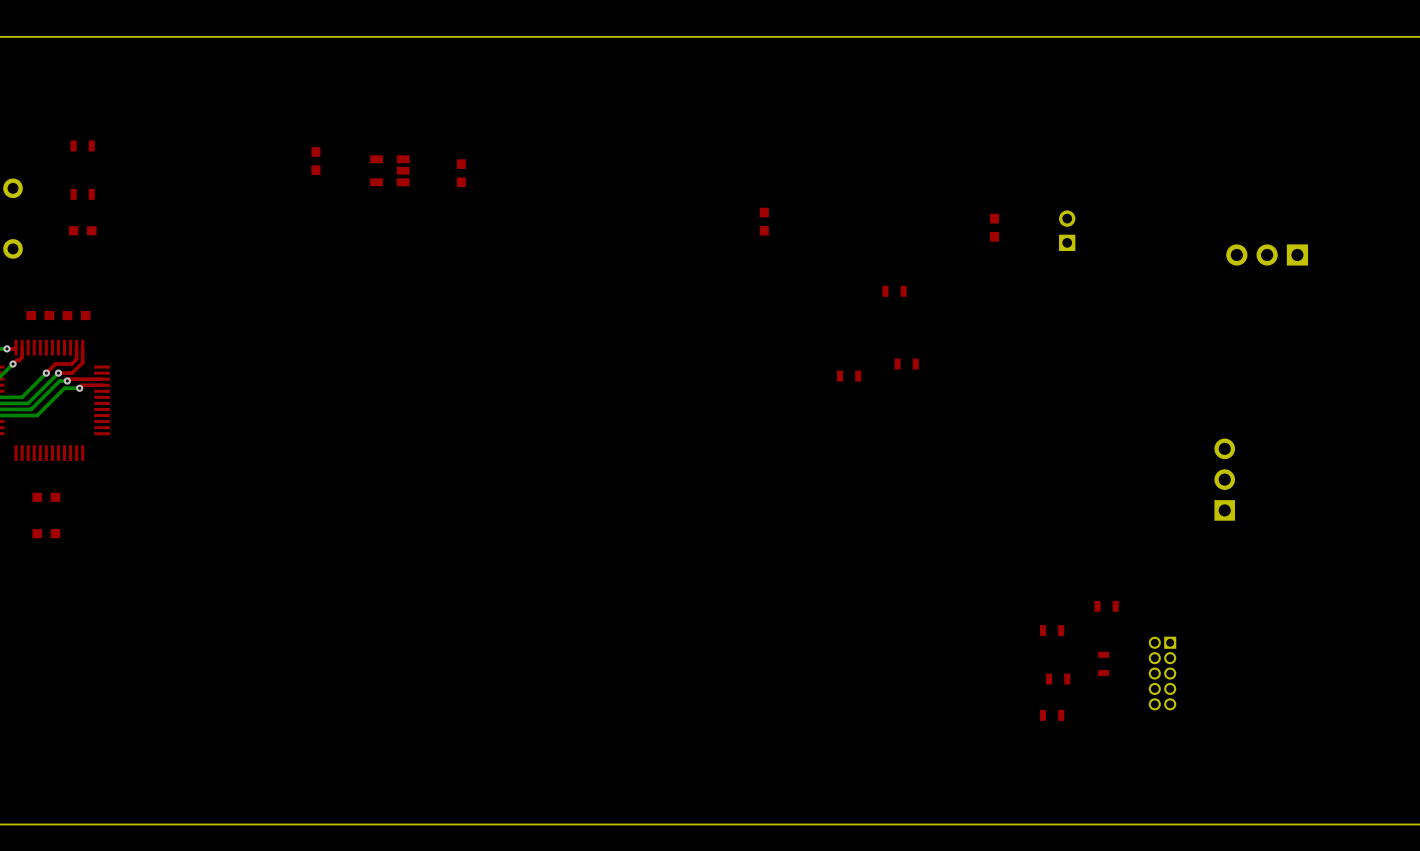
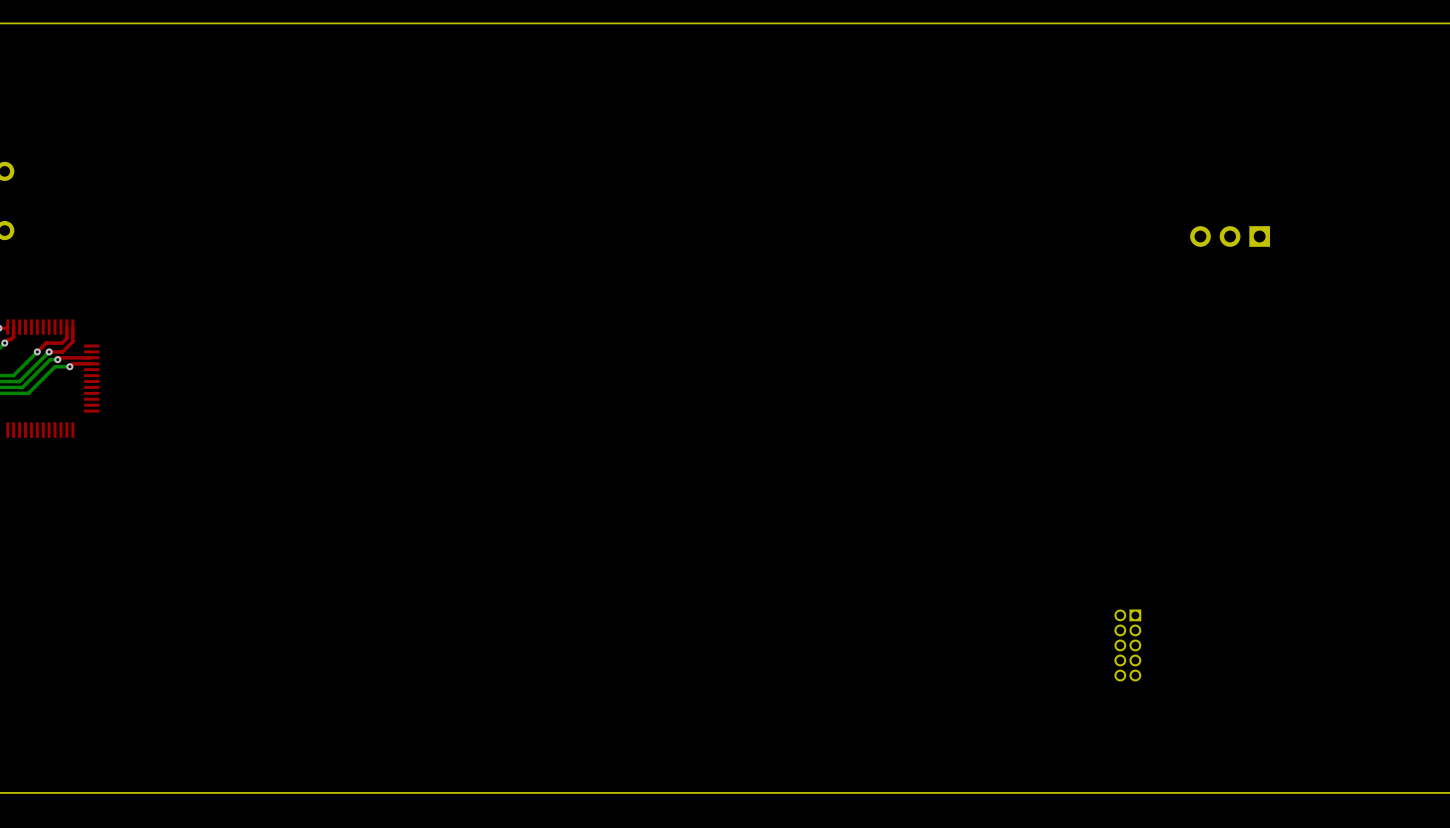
part: (82, 145) -> none
part: (315, 161) -> none
part: (389, 170) -> none
part: (461, 173) -> none
part: (82, 194) -> none
part: (764, 221) -> none
part: (994, 227) -> none
part: (82, 230) -> none
part: (1067, 230) -> none
part: (894, 291) -> none
part: (40, 315) -> none
part: (76, 315) -> none
part: (906, 364) -> none
part: (849, 376) -> none
part: (1224, 479) -> none
part: (46, 497) -> none
part: (46, 533) -> none
part: (1106, 606) -> none
part: (1052, 630) -> none
part: (1103, 663) -> none
part: (1058, 679) -> none
part: (1052, 715) -> none

